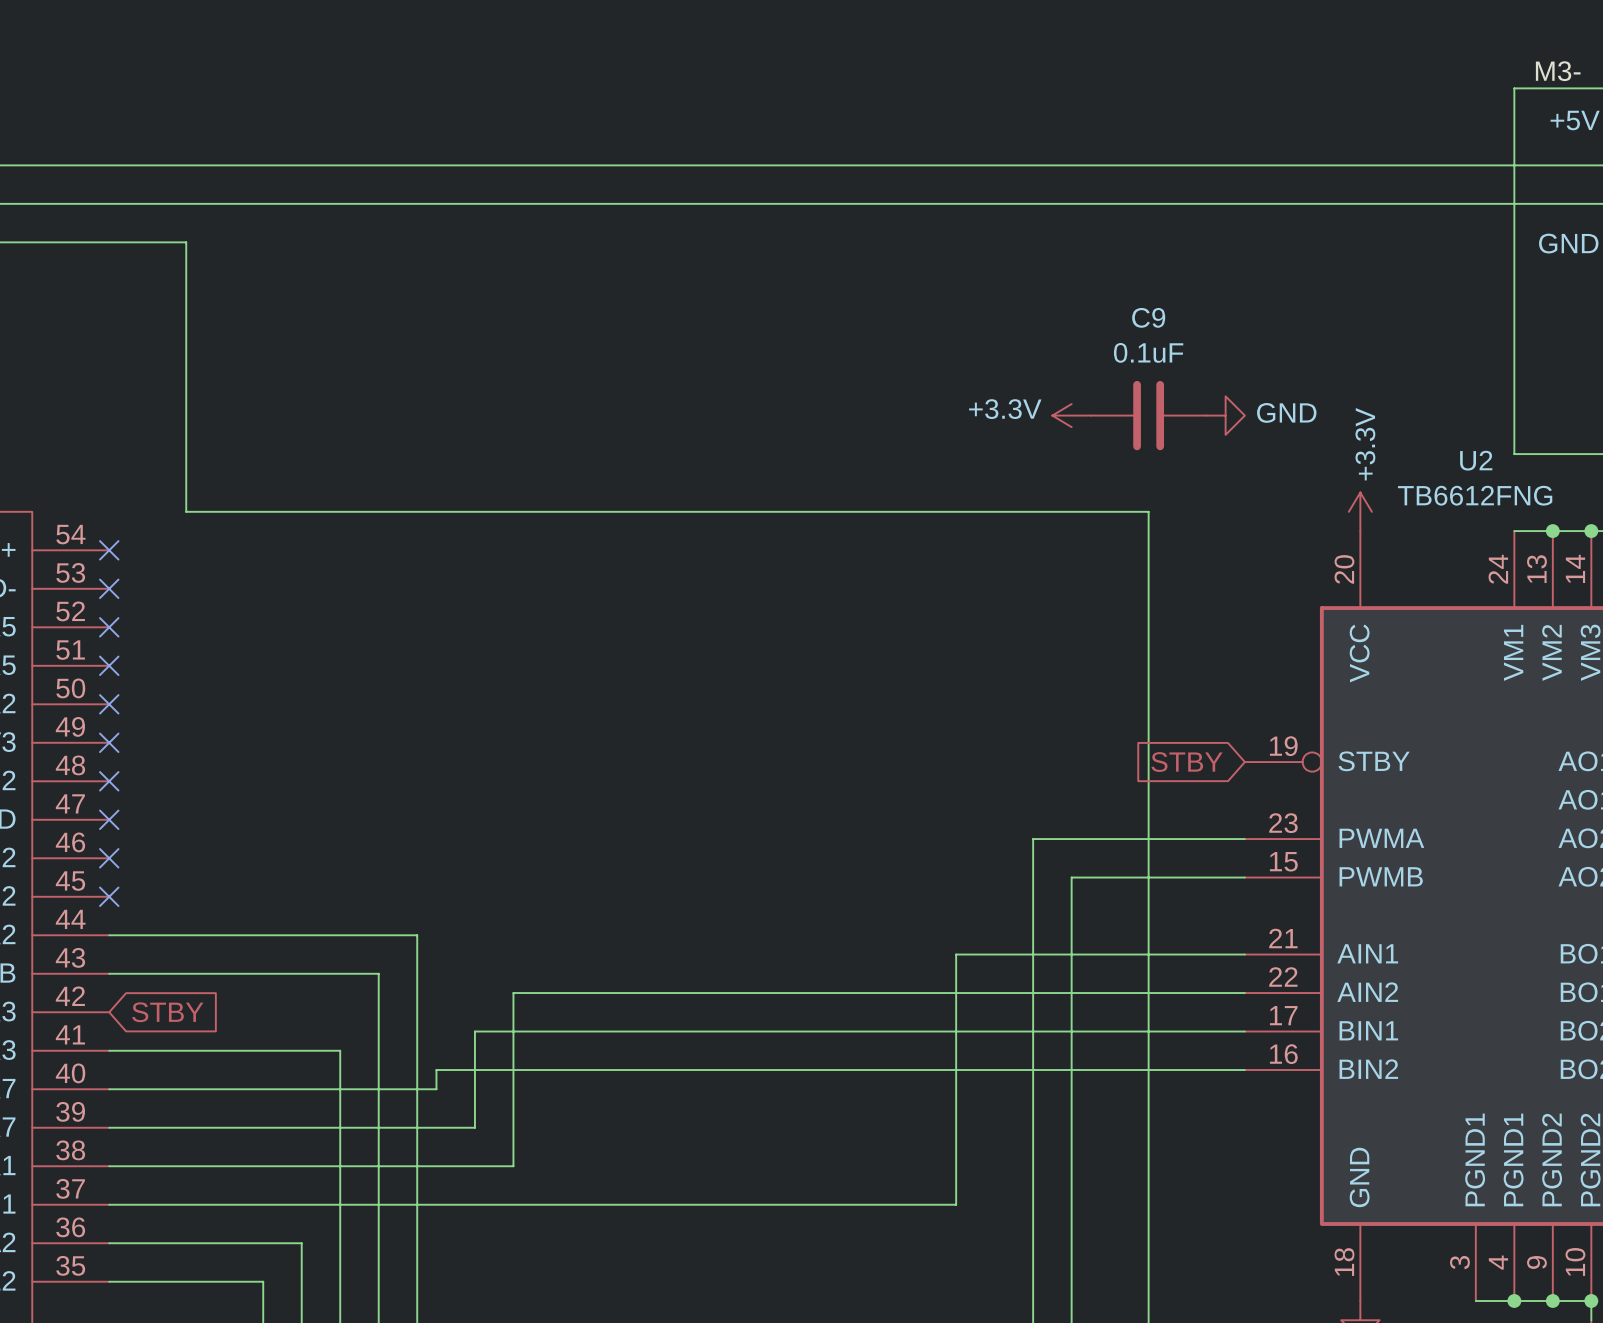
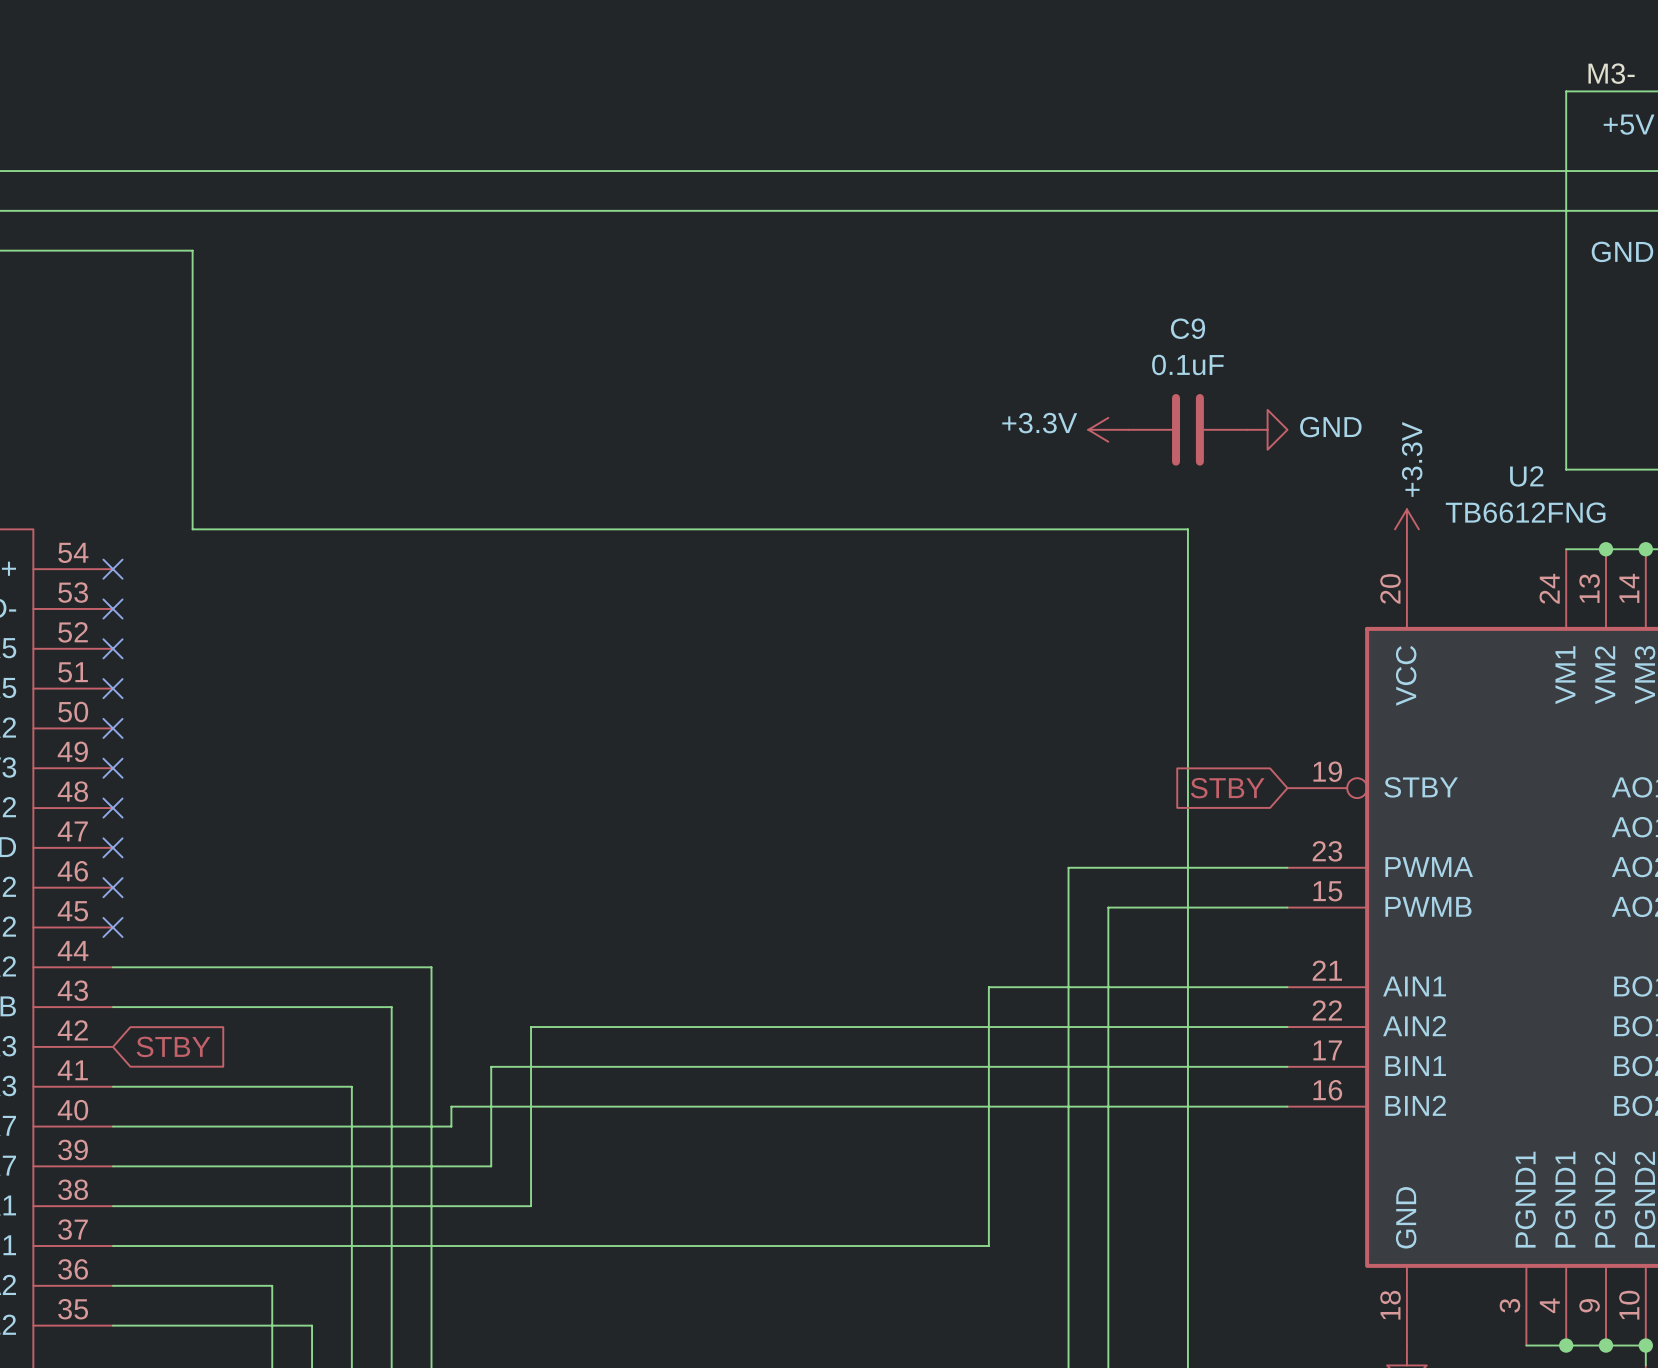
wire: (263, 1243) (301, 1243) (301, 1281) -> (272, 1285) (272, 1325) (312, 1325)

